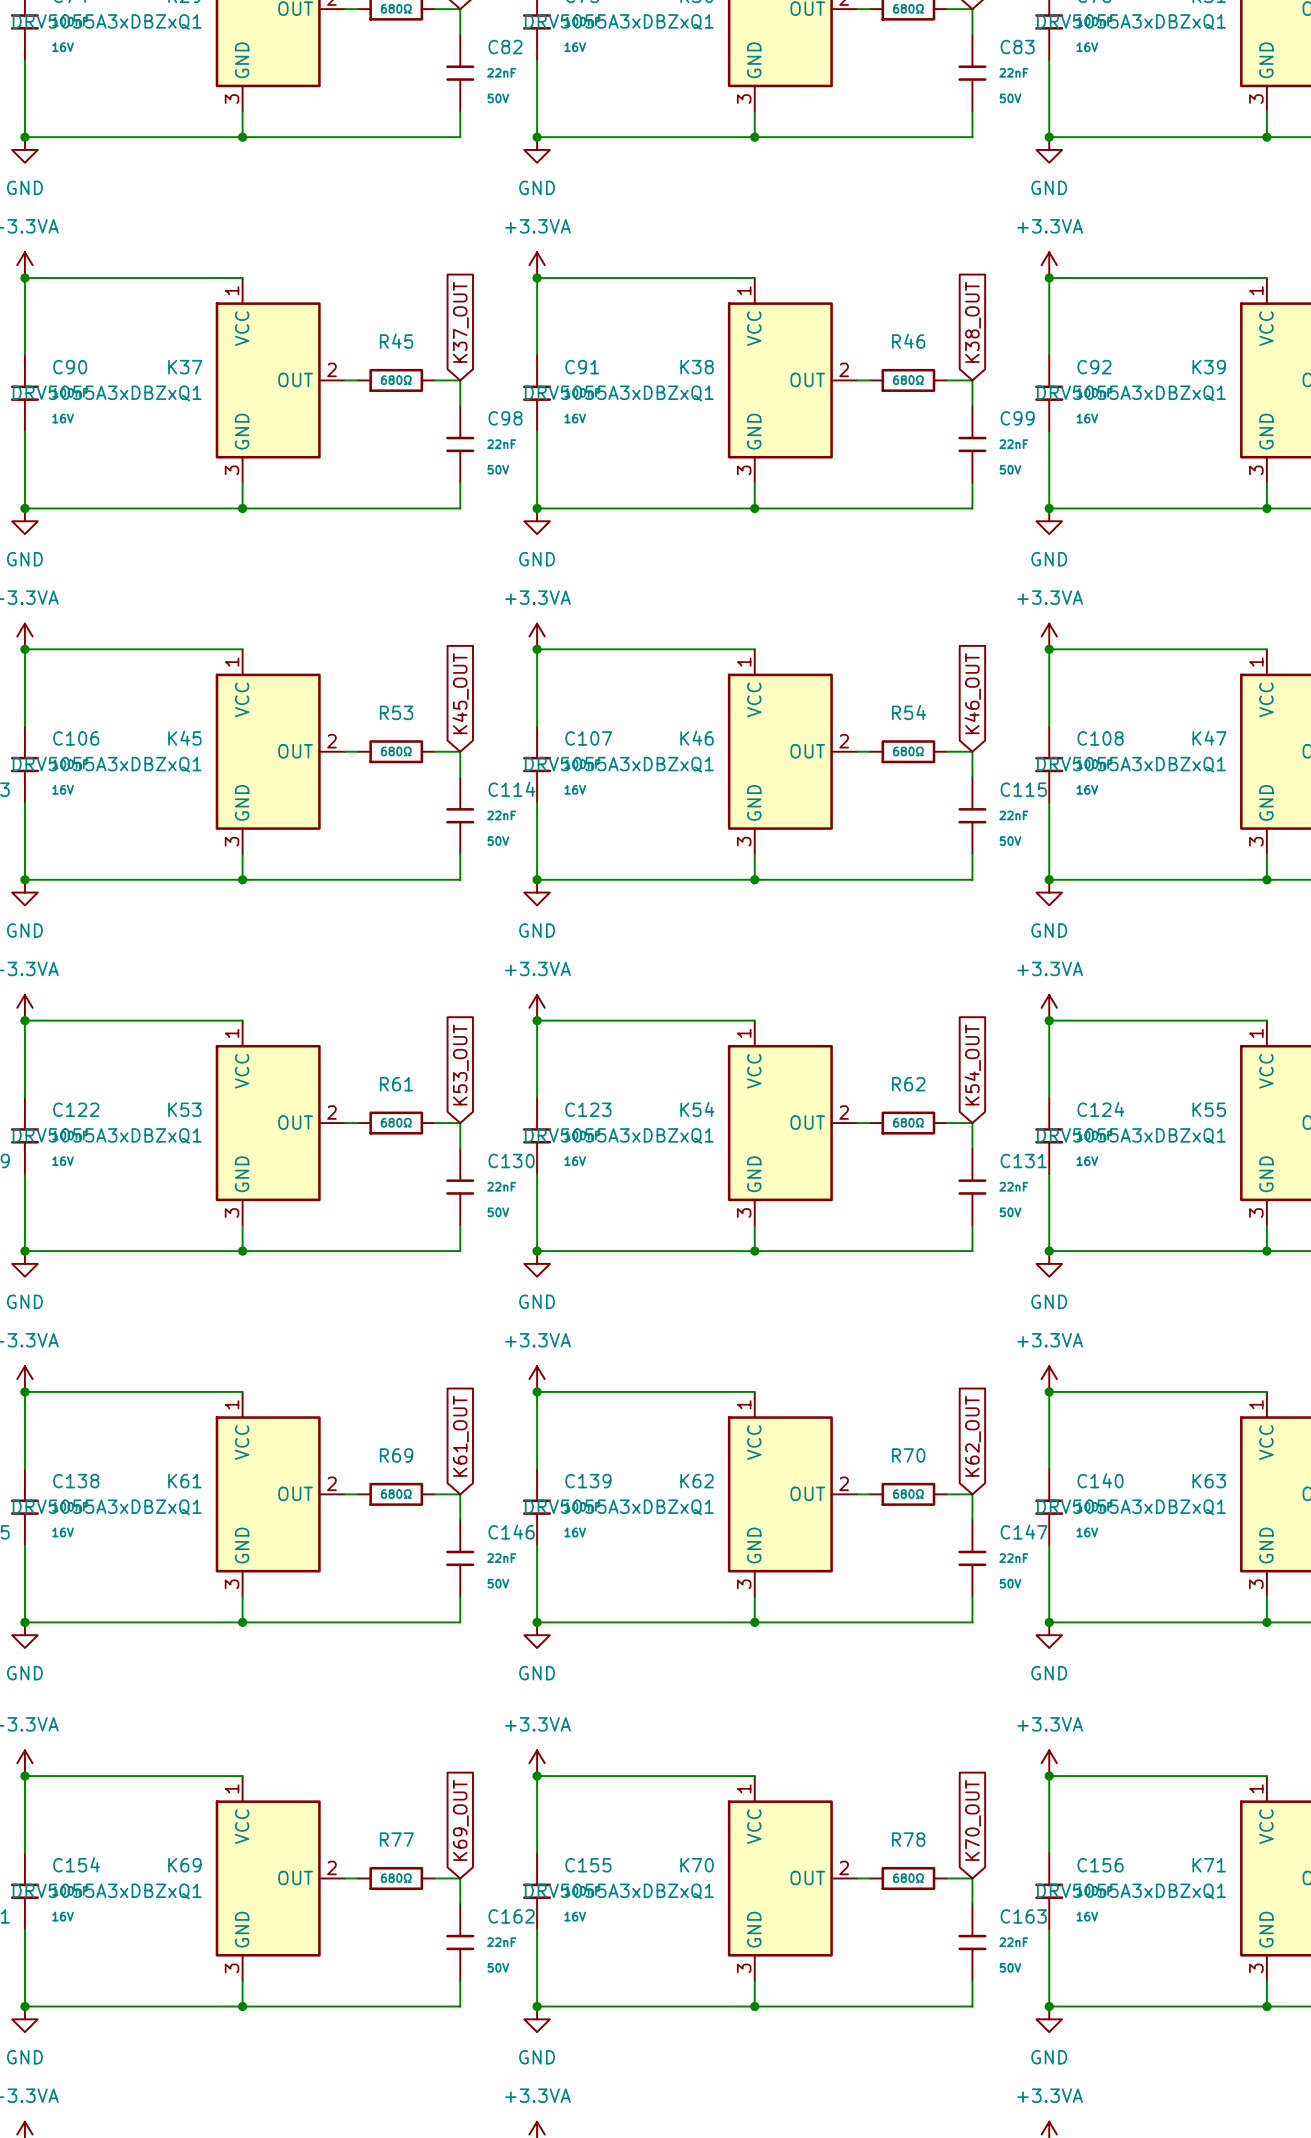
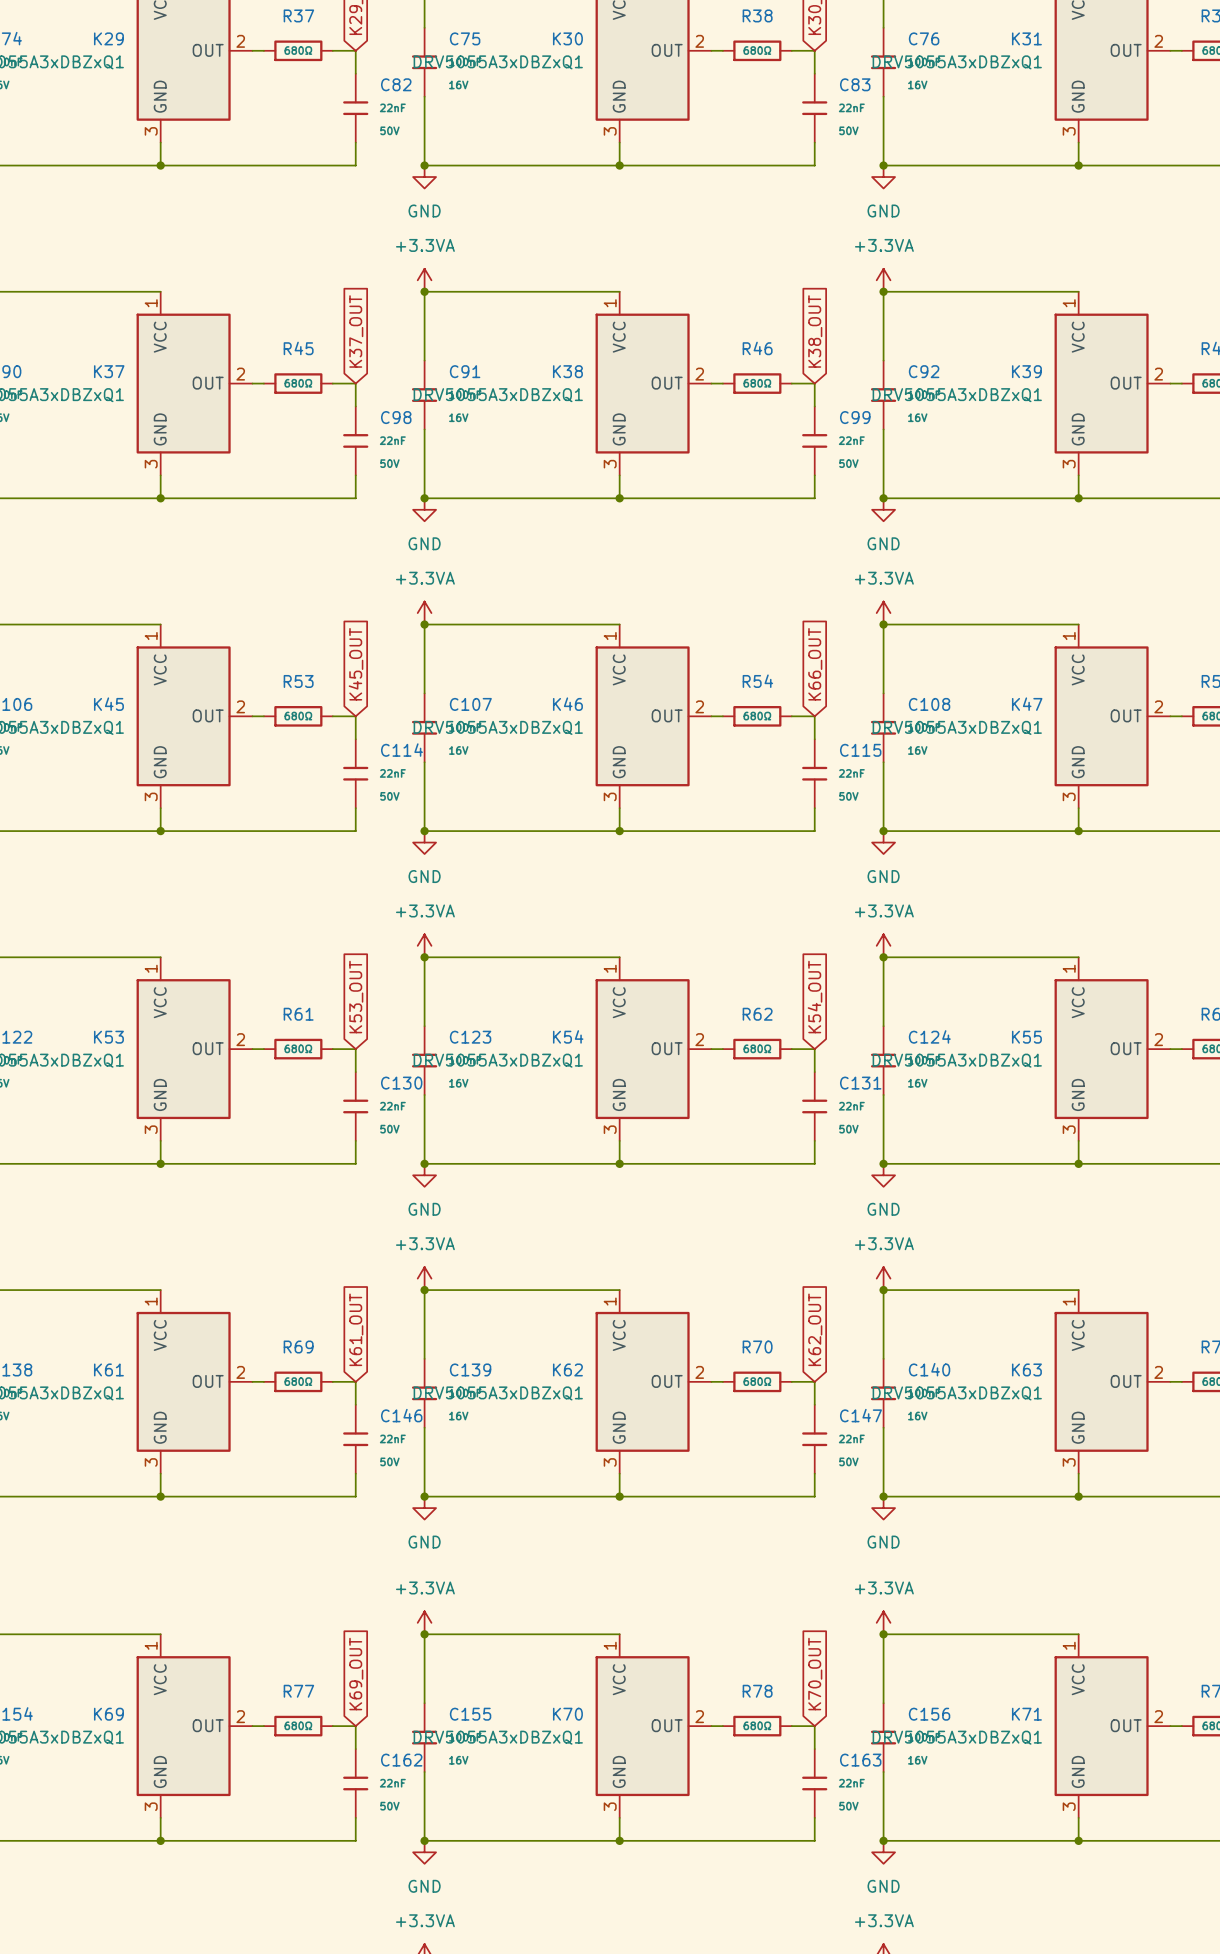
global label: K46_OUT (972, 693) -> K66_OUT (815, 664)

